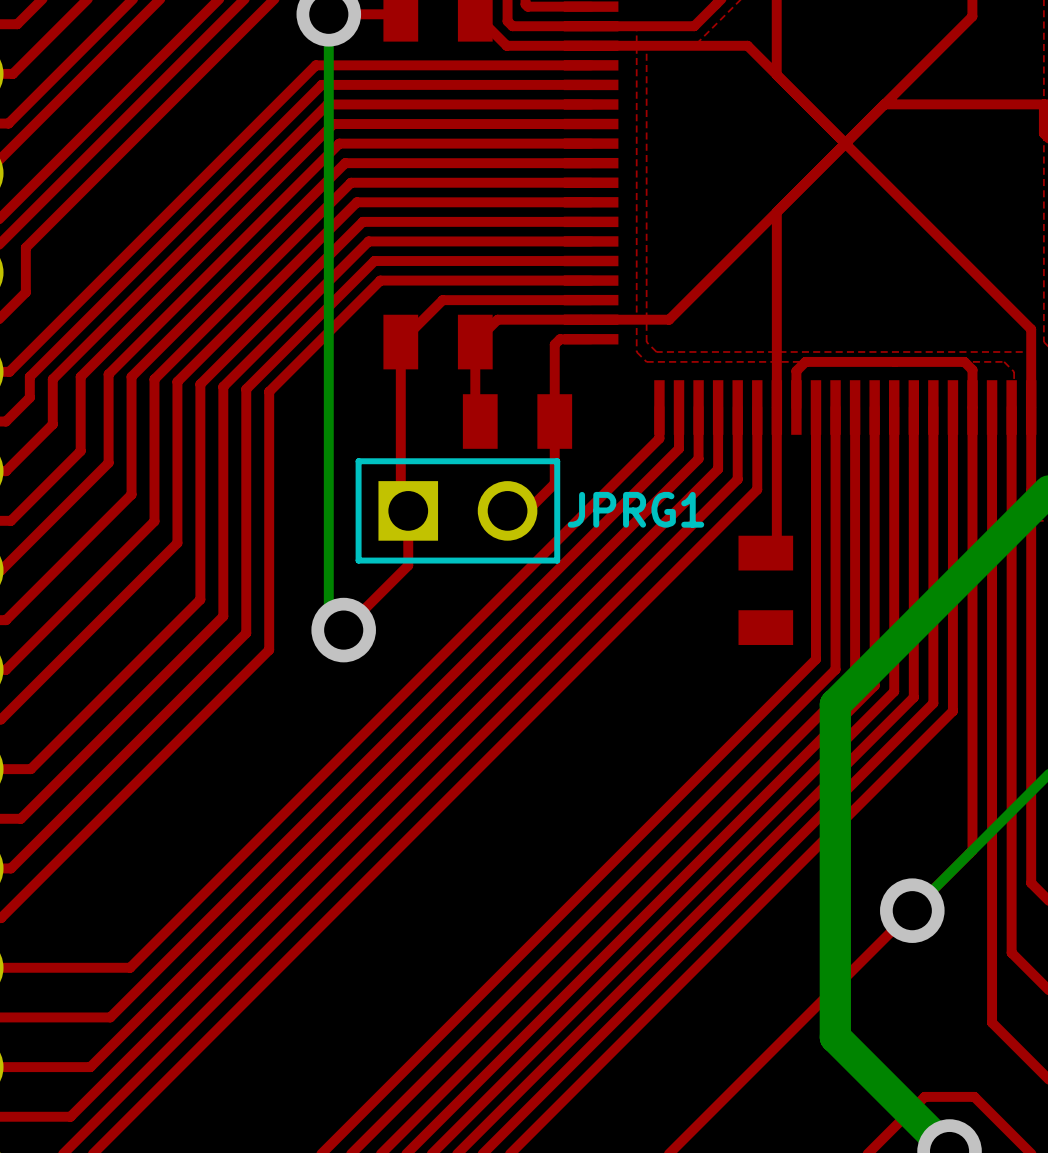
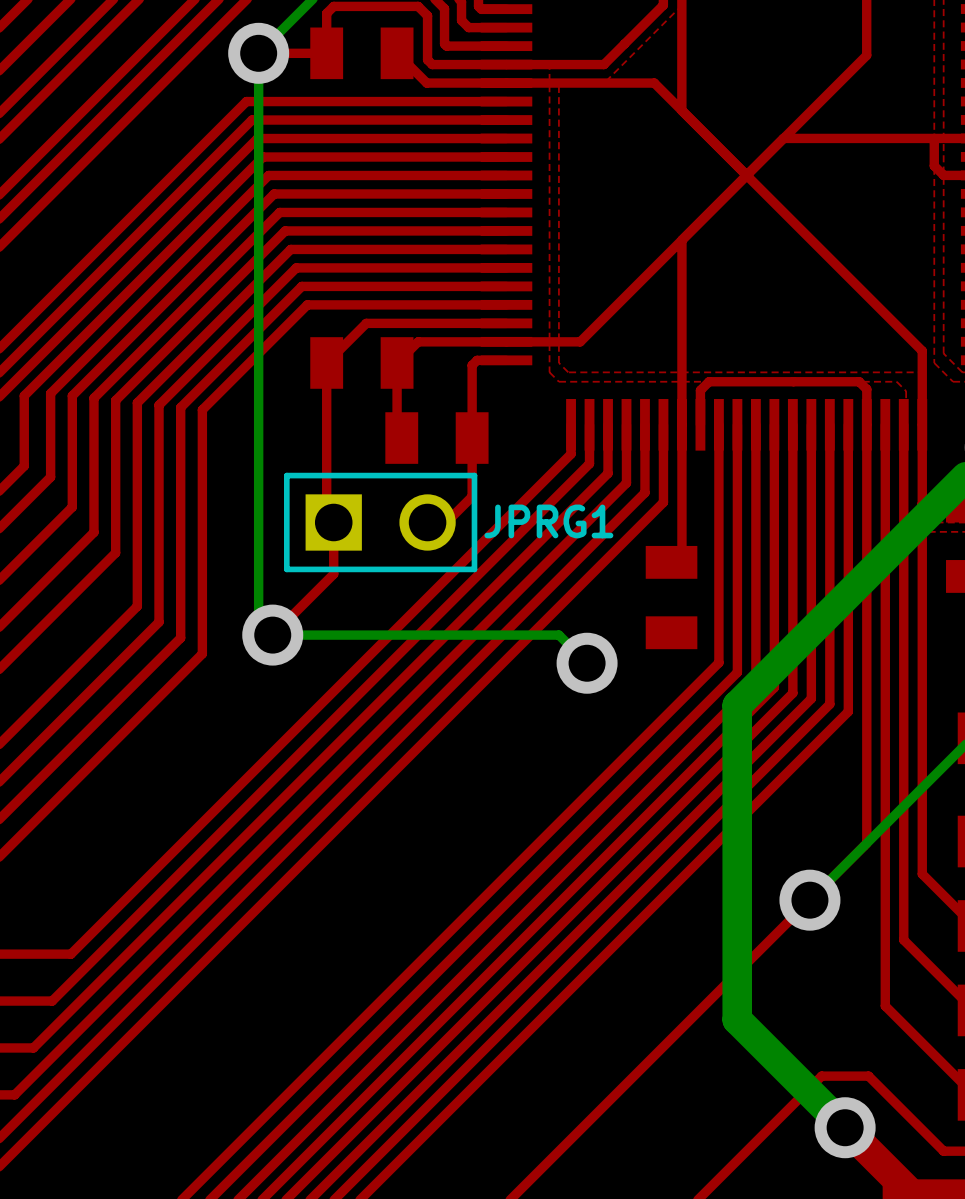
bottom track: none -> (272, 635) (558, 635) (587, 663)
via: none -> (587, 663)

